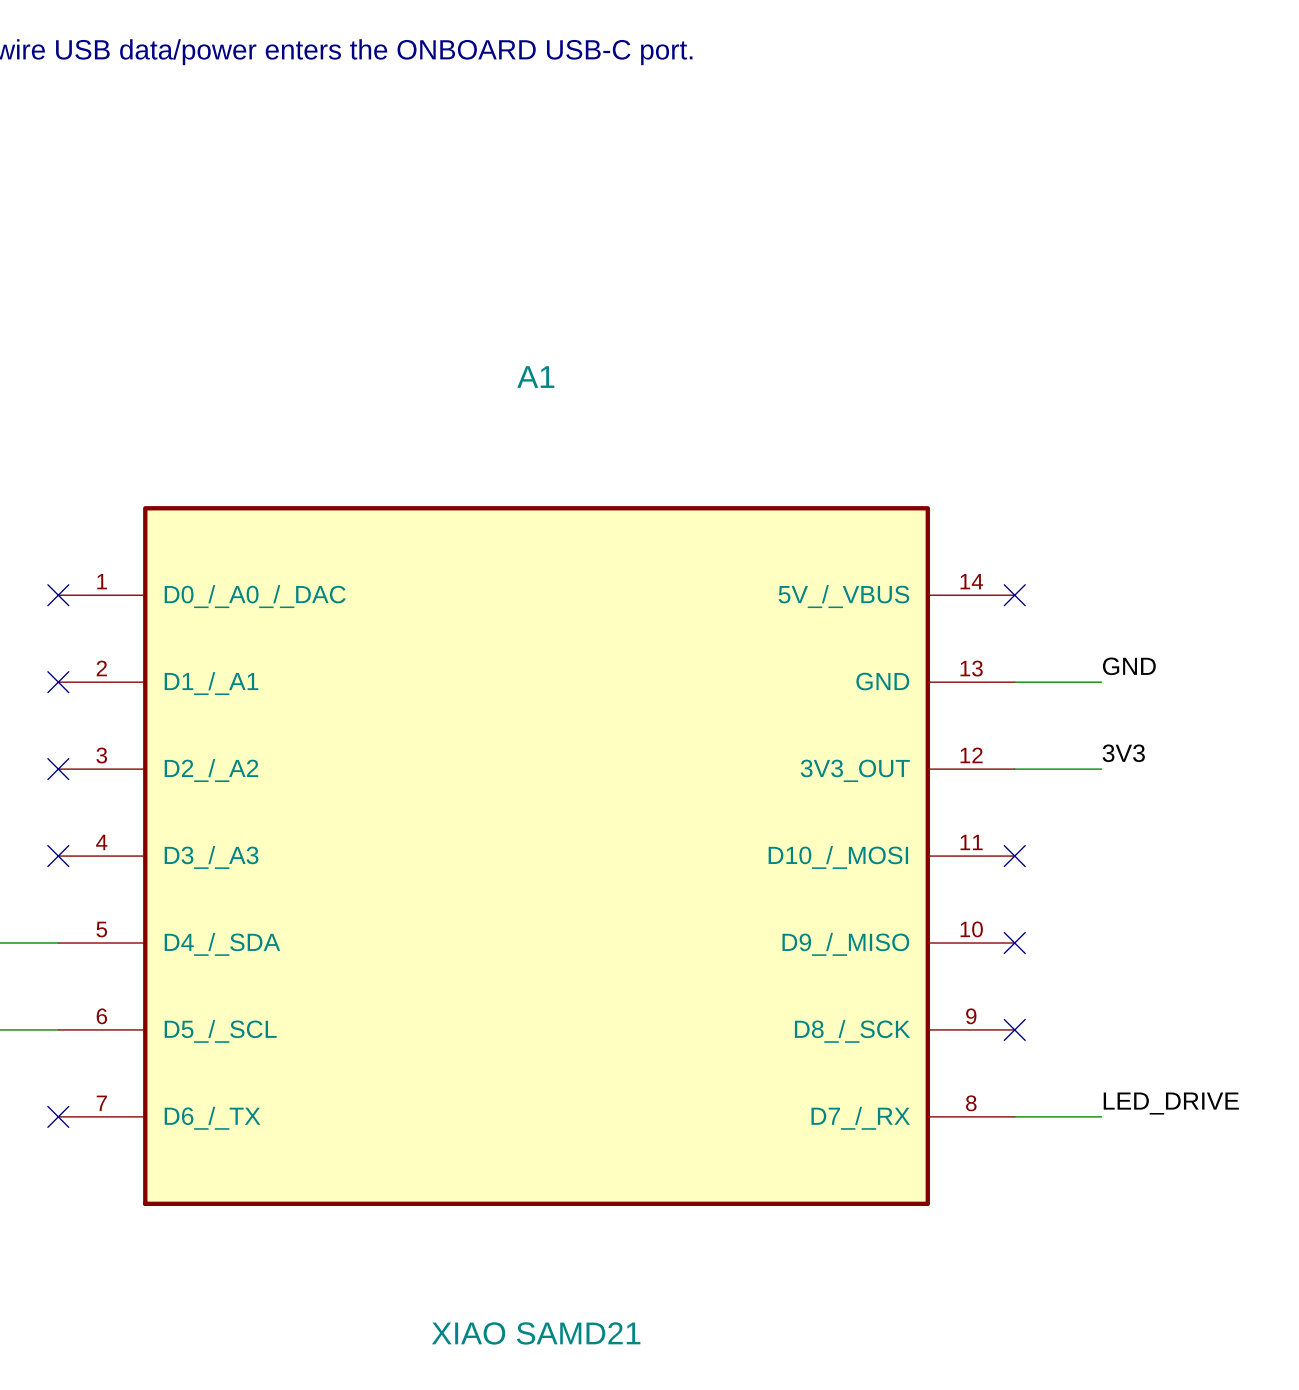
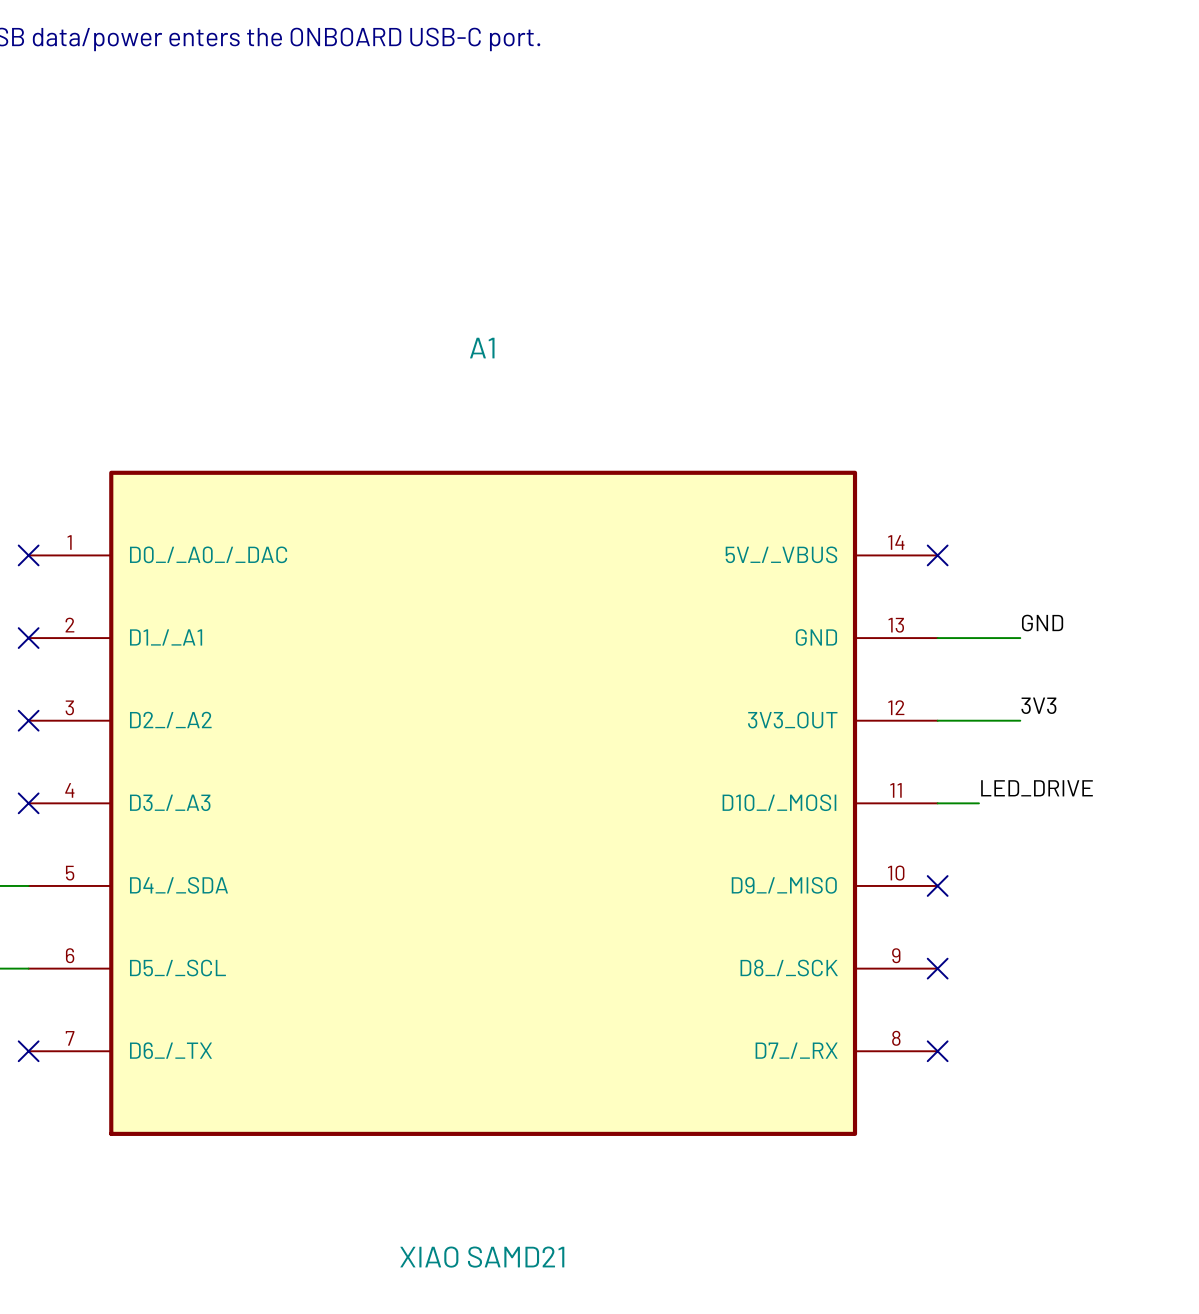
wire: none -> (937, 803) (978, 803)
no-connect mark: (1014, 856) -> none
label position: LED_DRIVE (1171, 1103) -> LED_DRIVE (1037, 788)
wire: (1014, 1116) (1101, 1116) -> none
no-connect mark: none -> (937, 1051)

